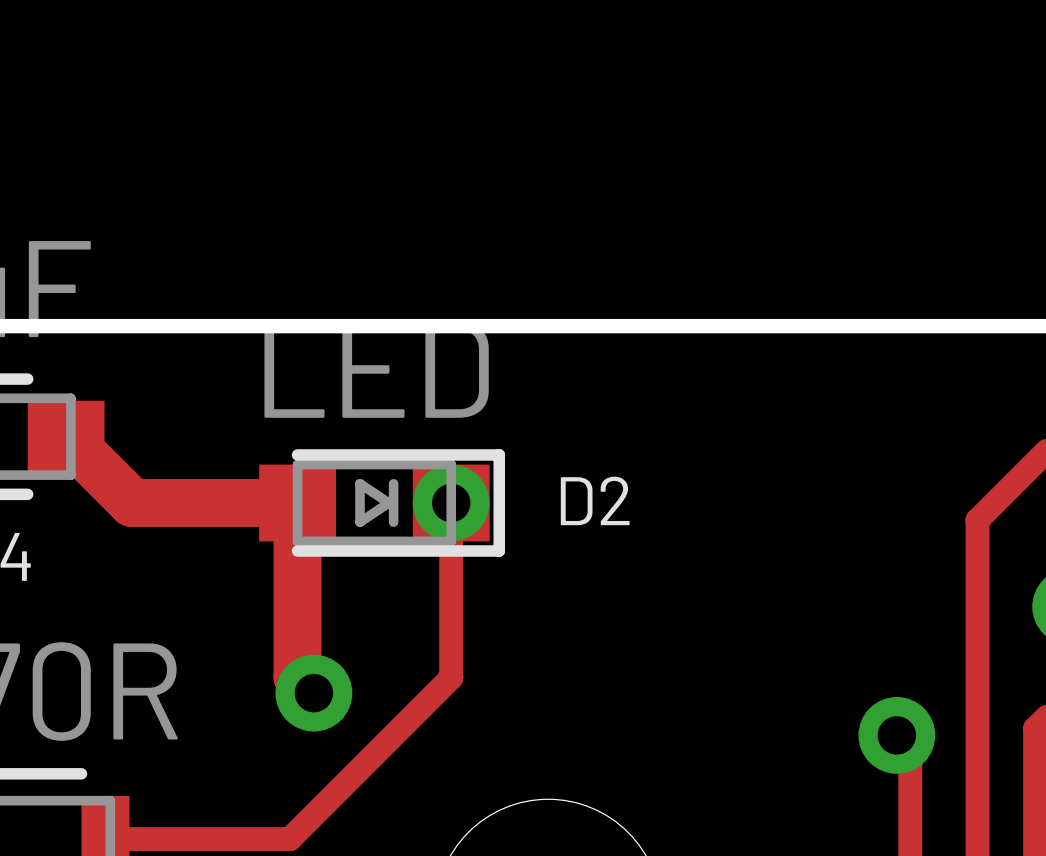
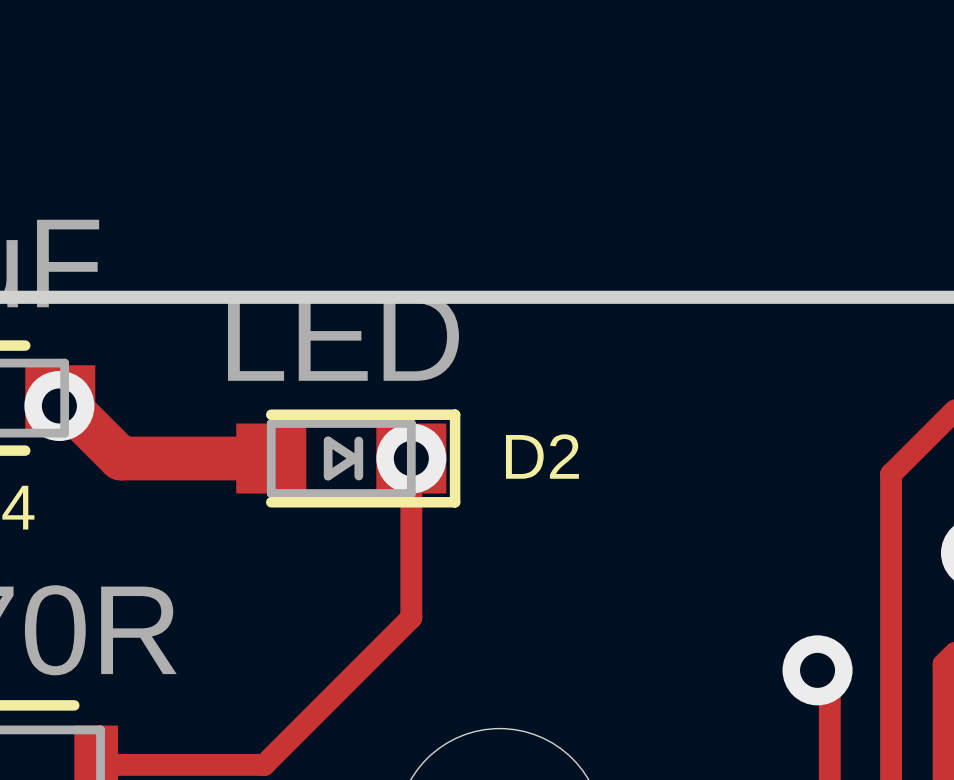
via: none -> (59, 405)
track: (297, 502) (297, 676) (313, 693) -> none
via: (313, 693) -> none

